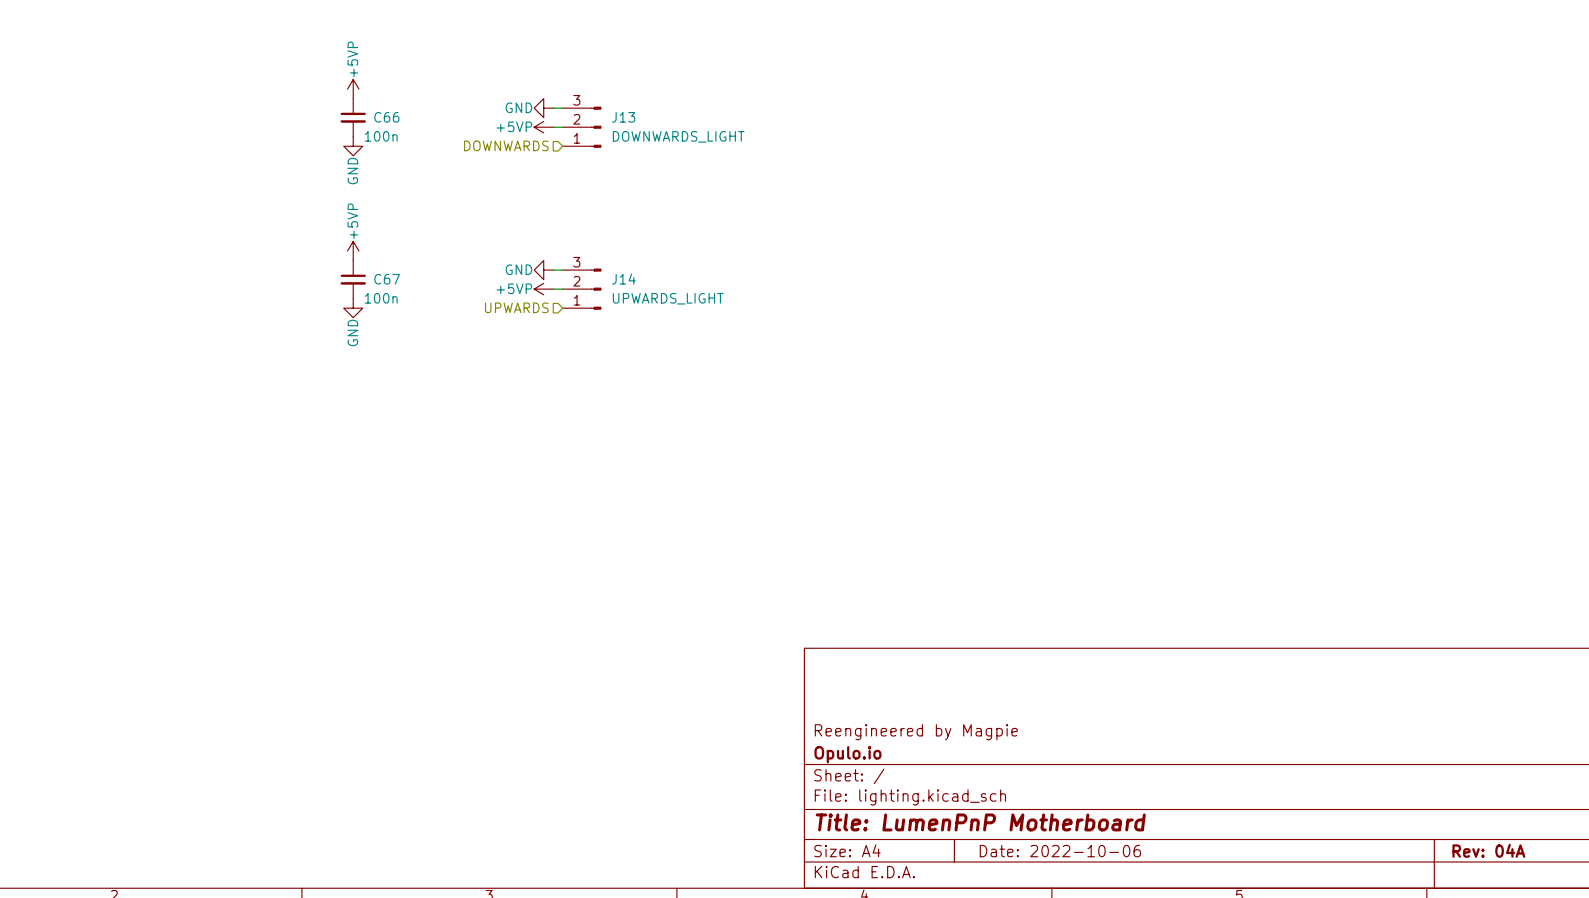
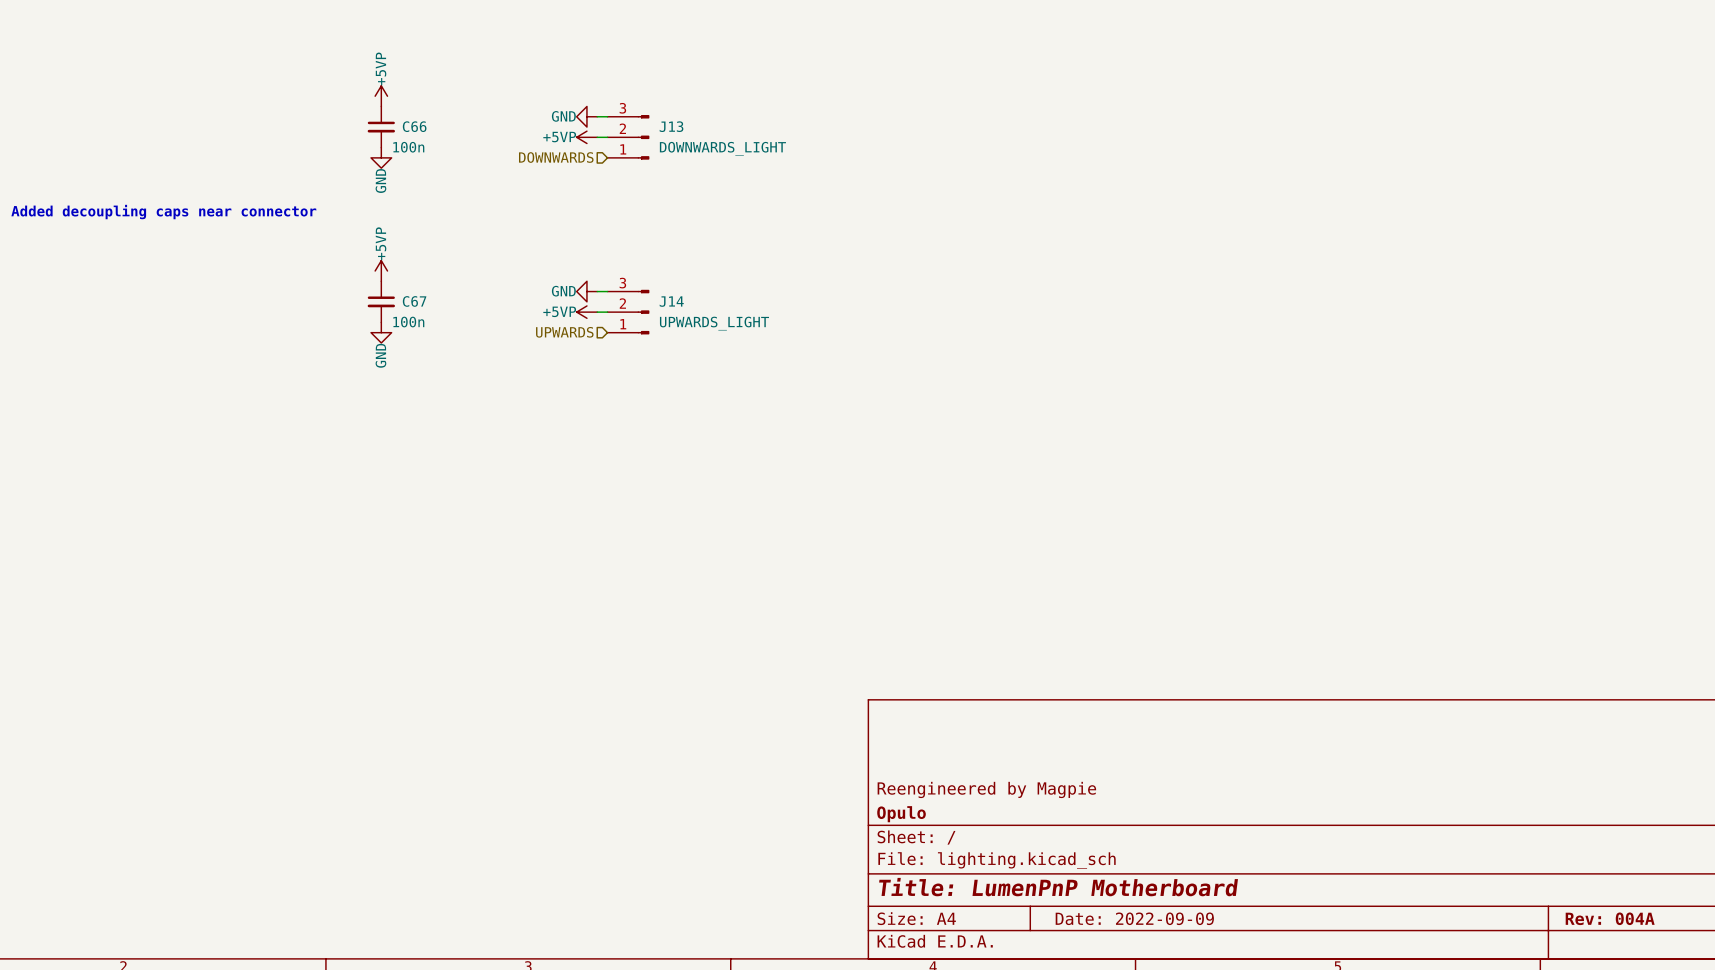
text: none -> Added decoupling caps near connector (163, 212)
title block: Opulo.io (847, 754) -> Opulo (901, 814)
title block: Rev: 04A (1488, 850) -> Rev: 004A (1610, 918)
title block: Date: 2022-10-06 (1060, 851) -> Date: 2022-09-09 (1134, 918)

